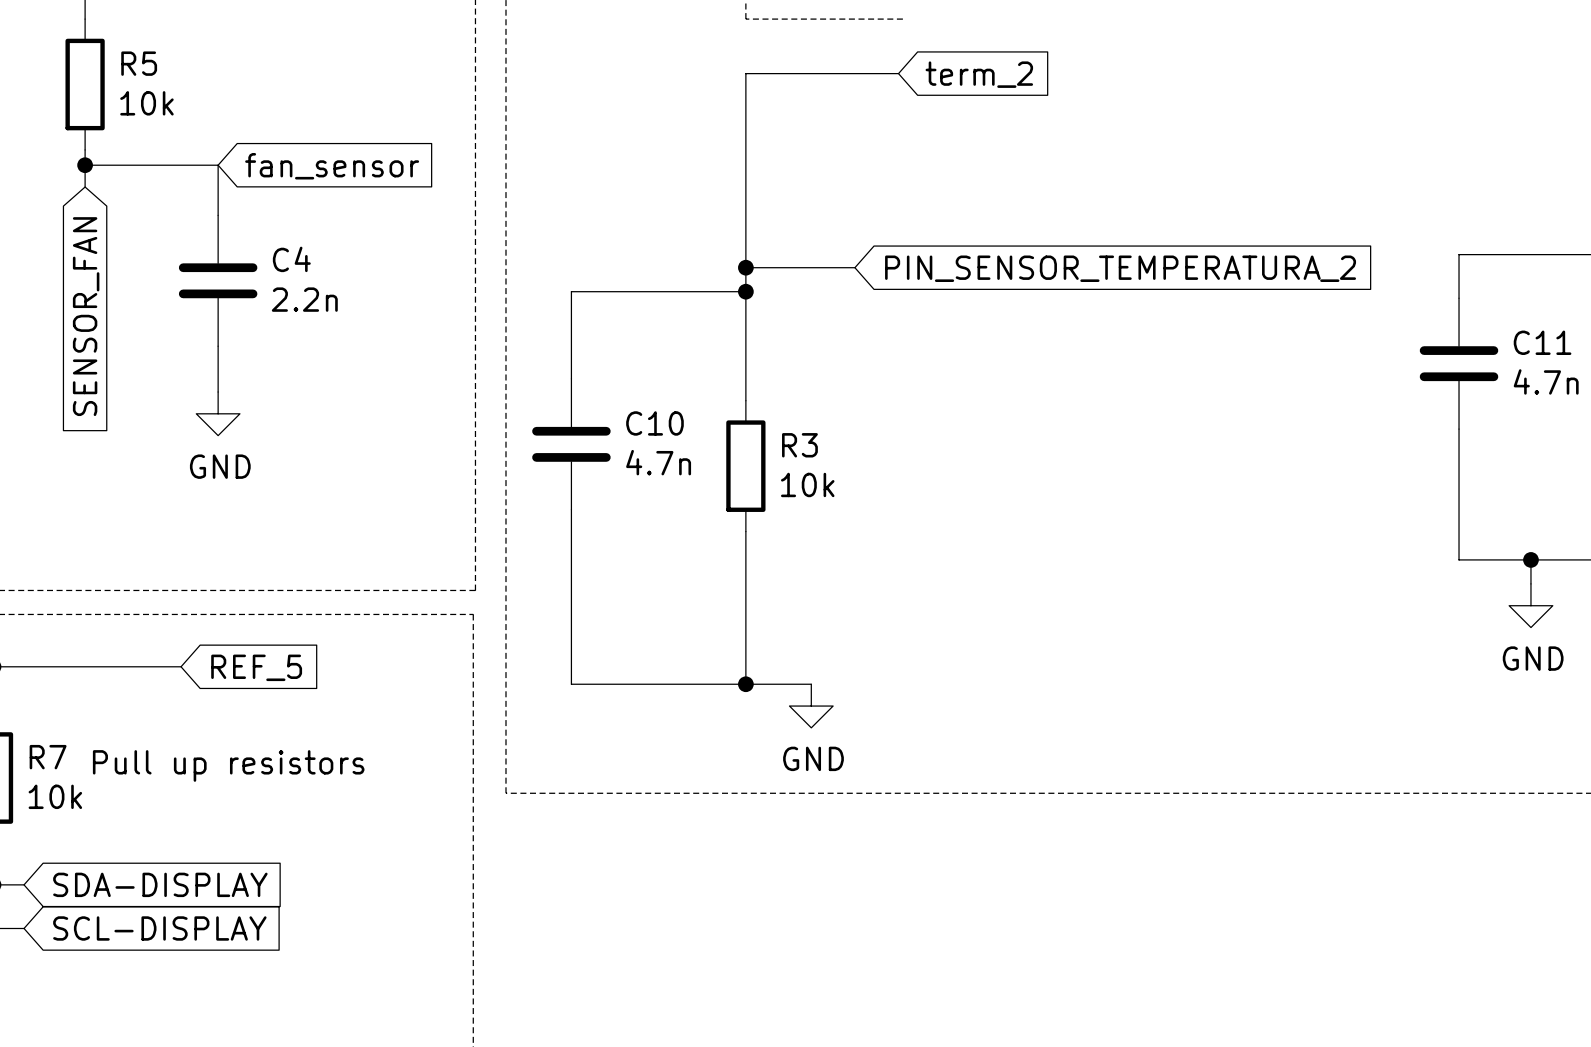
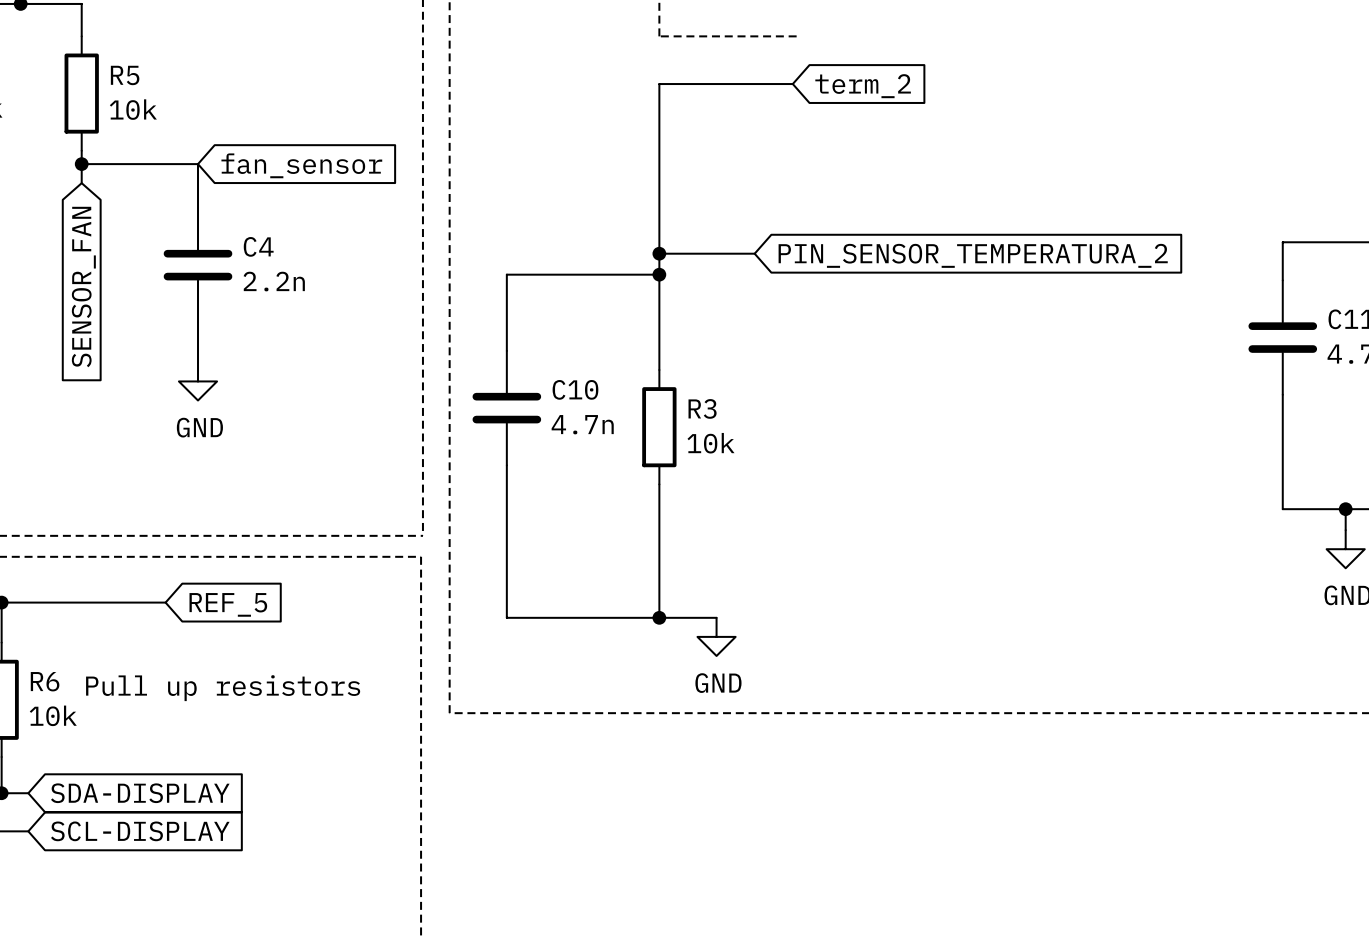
R7 name: R7 (48, 757) -> R6 (45, 681)

